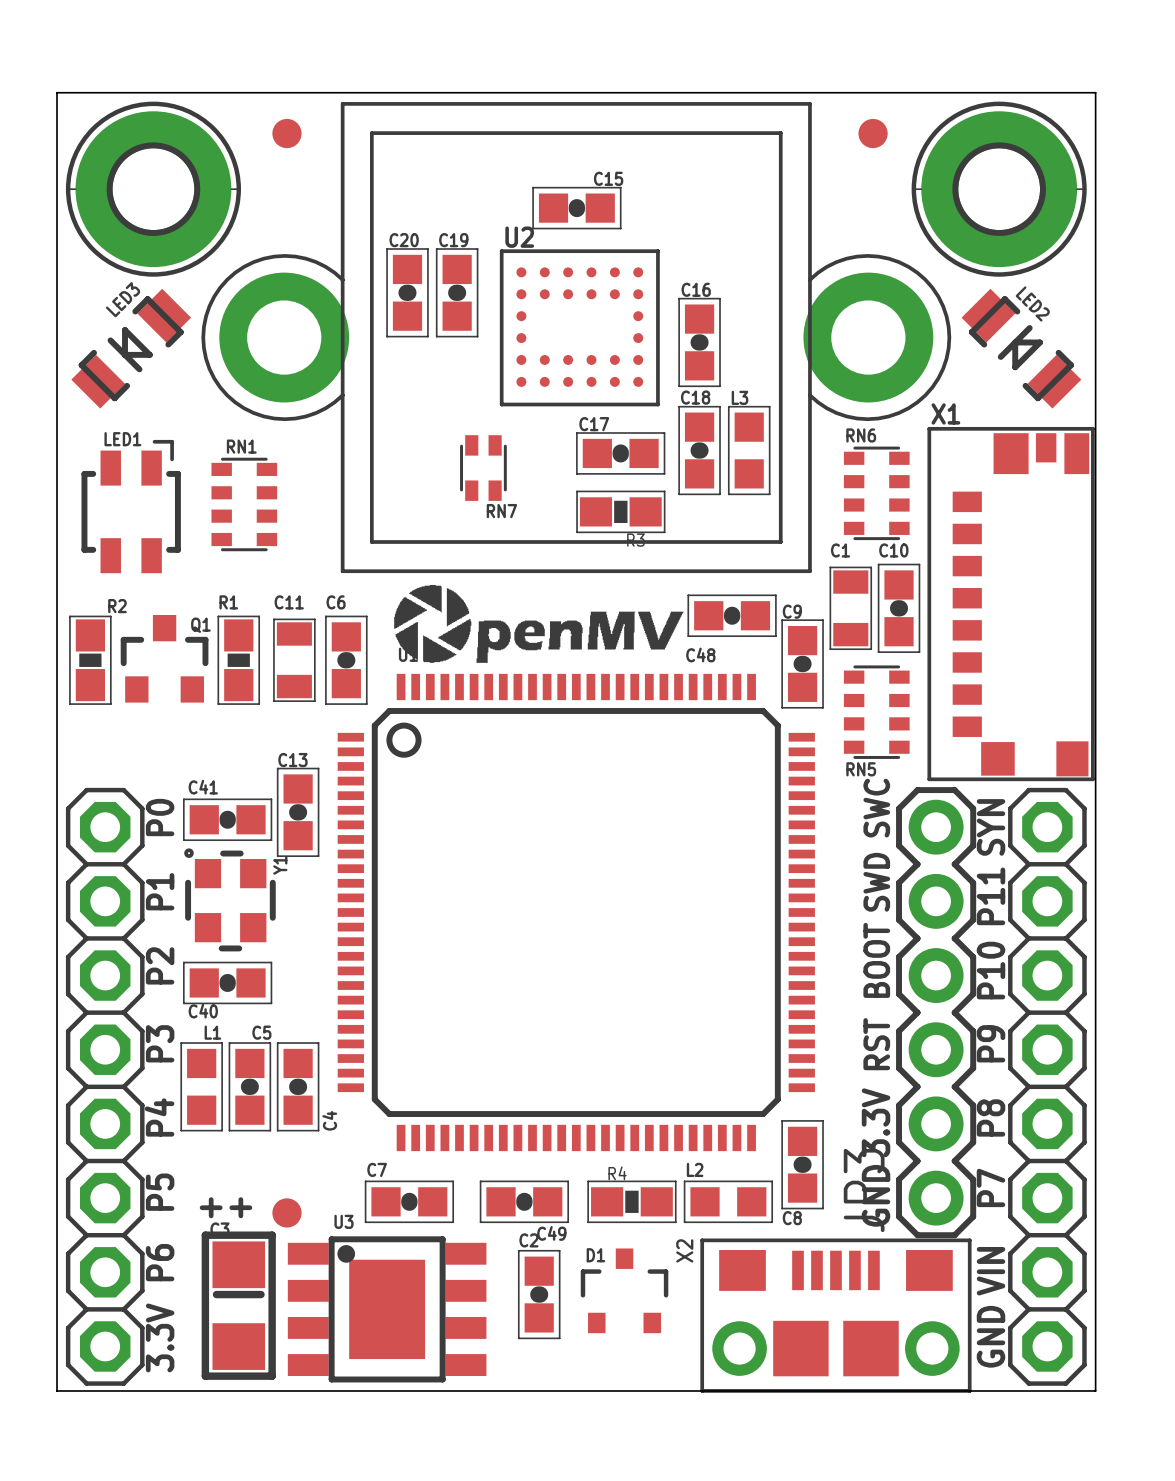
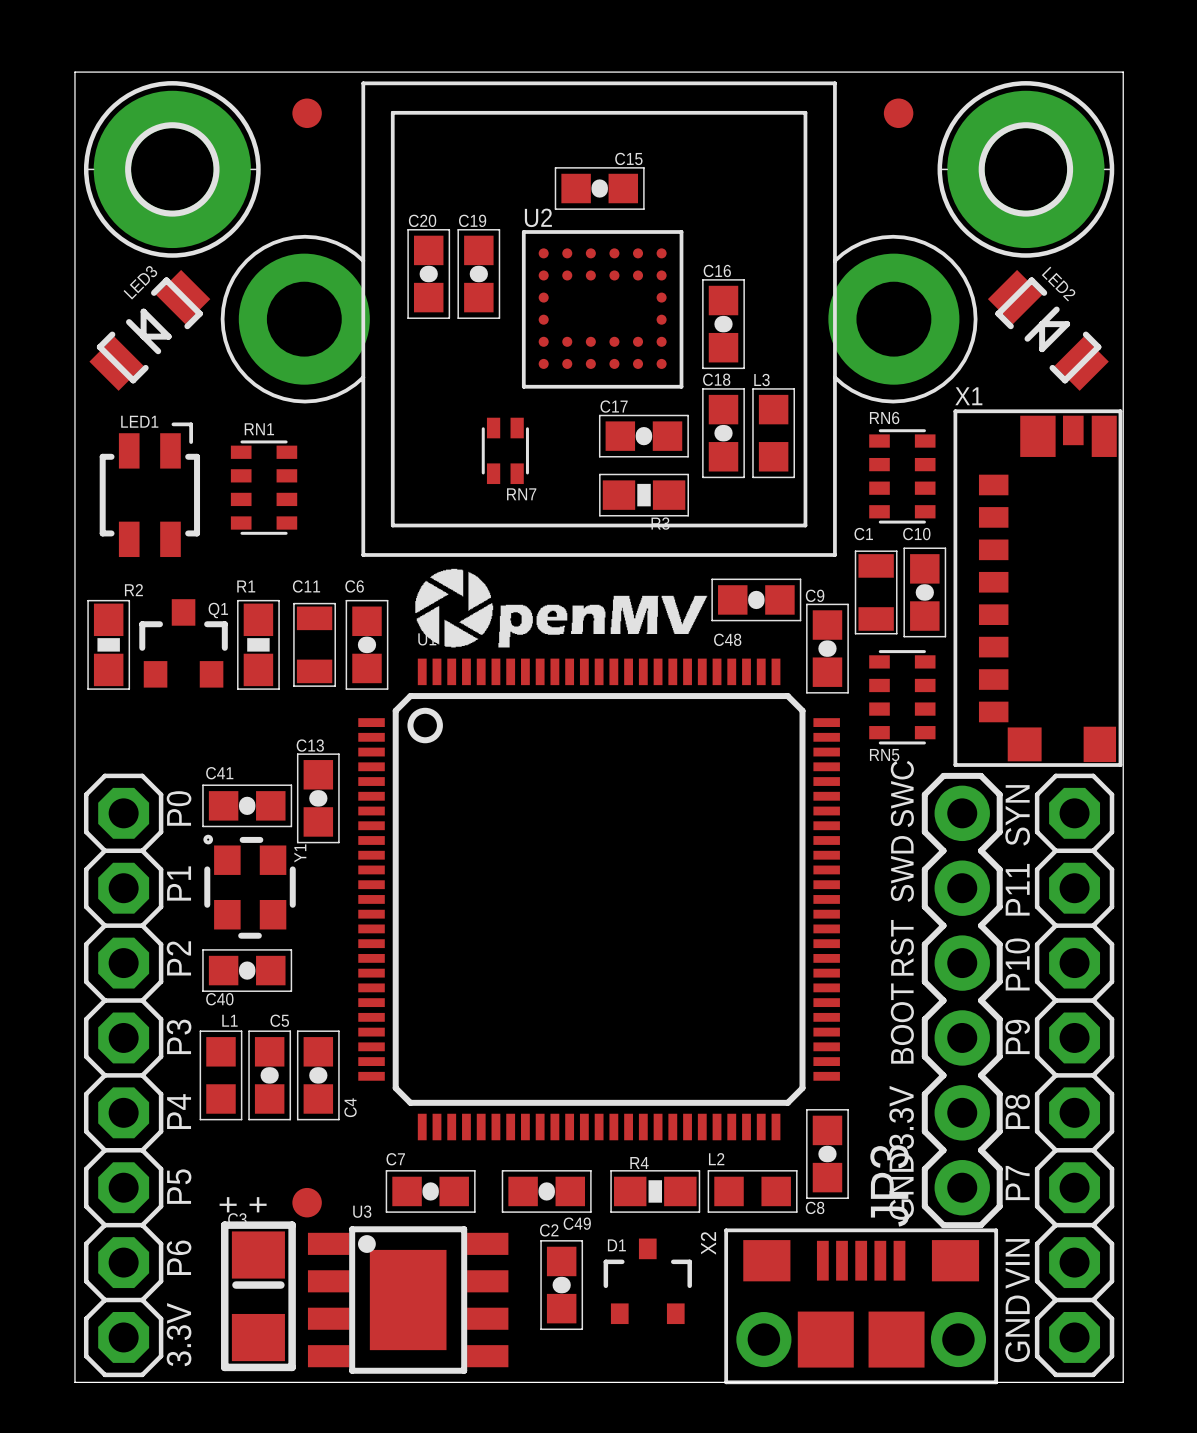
text: BOOT (876, 960) -> RST (902, 947)
text: RST (876, 1044) -> BOOT (902, 1023)

